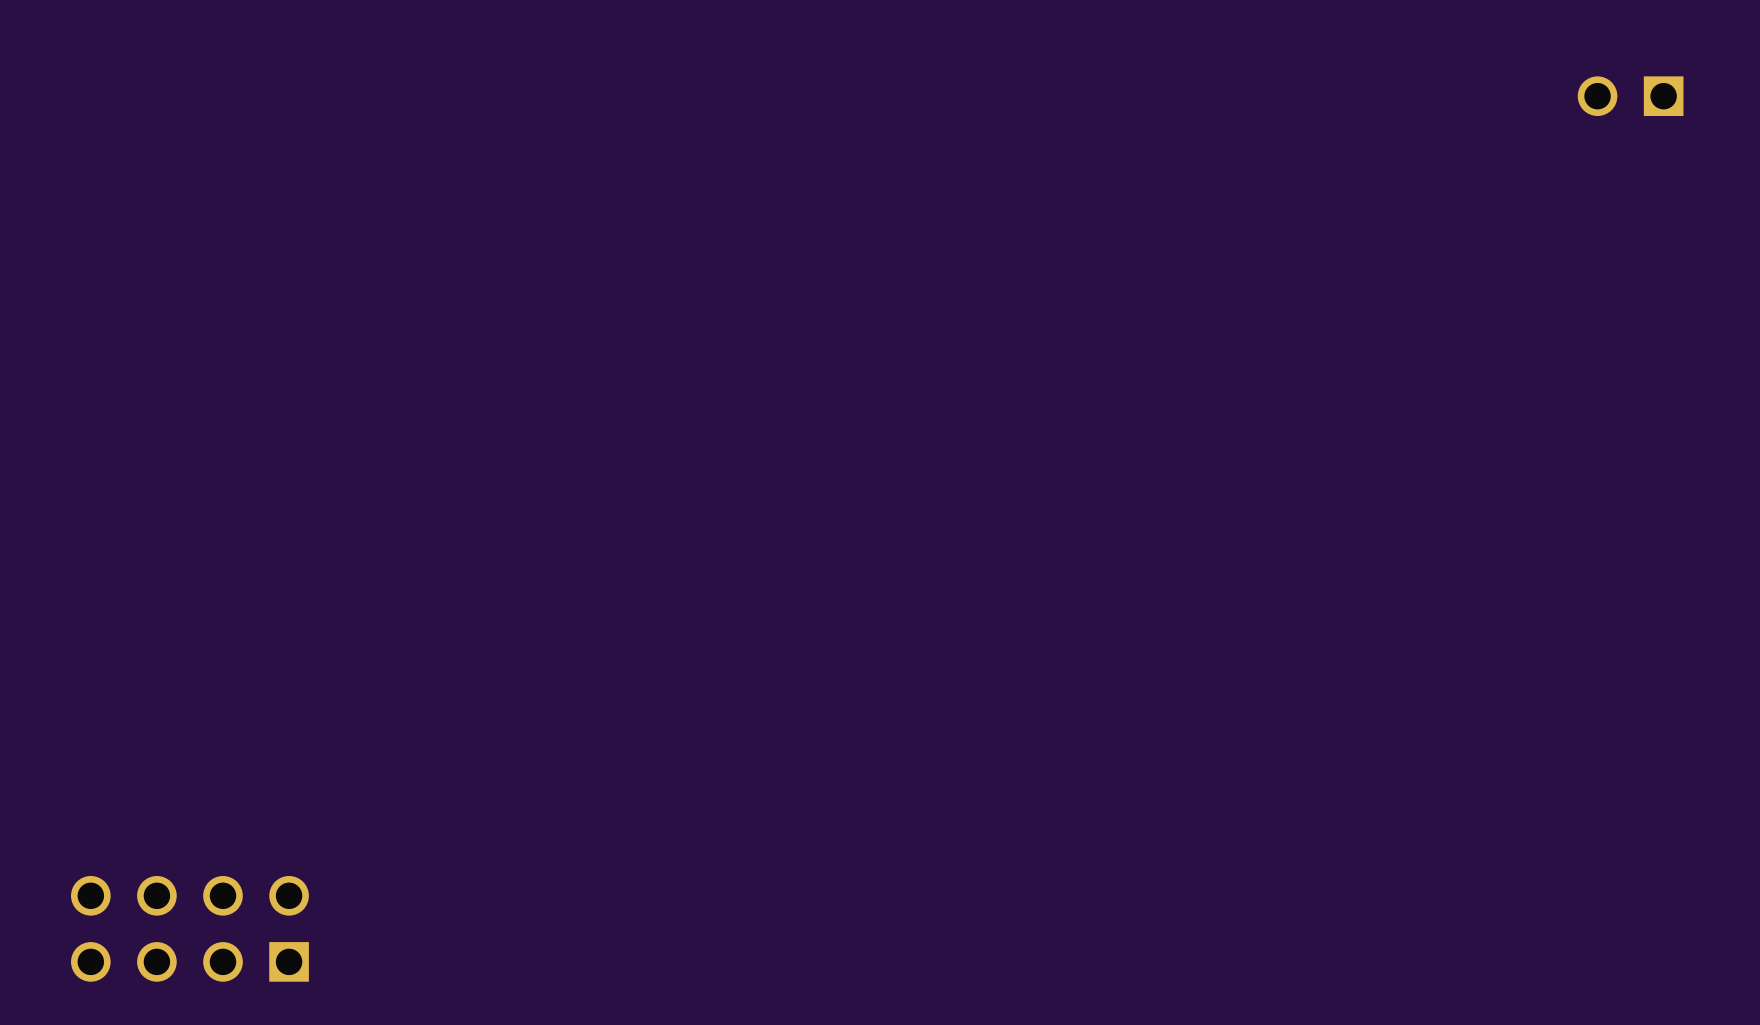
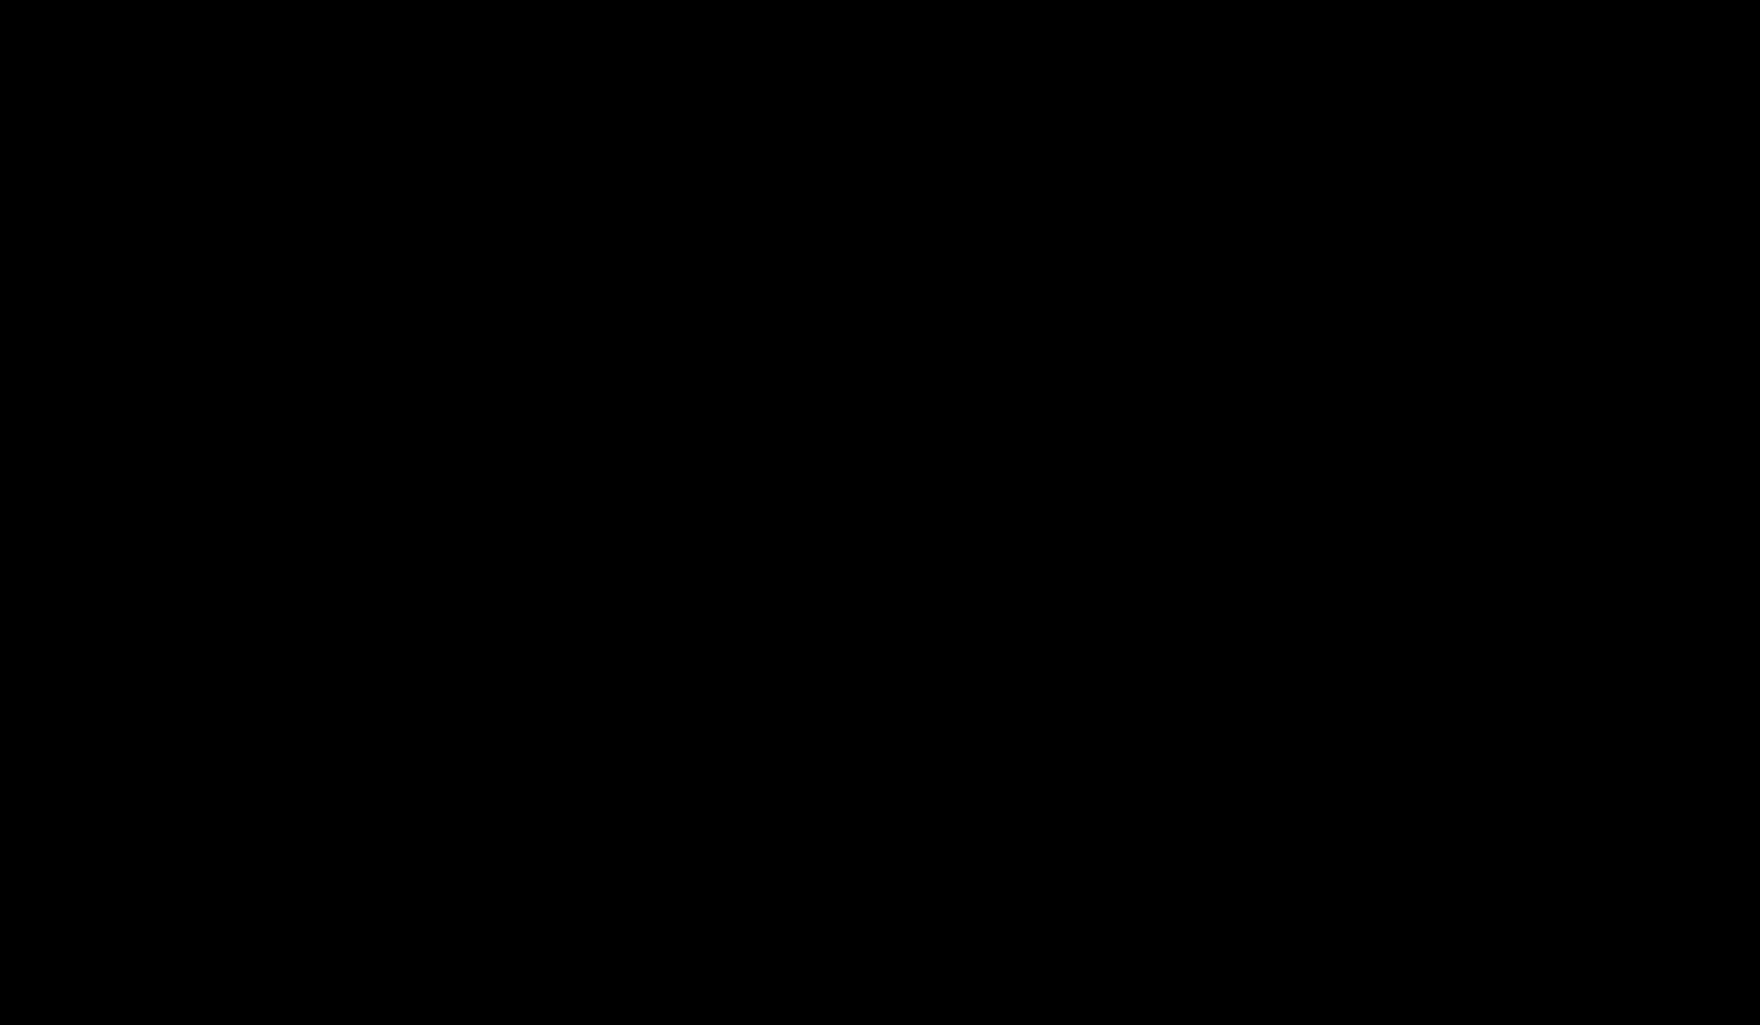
part: (1630, 96) -> none
part: (189, 928) -> none

